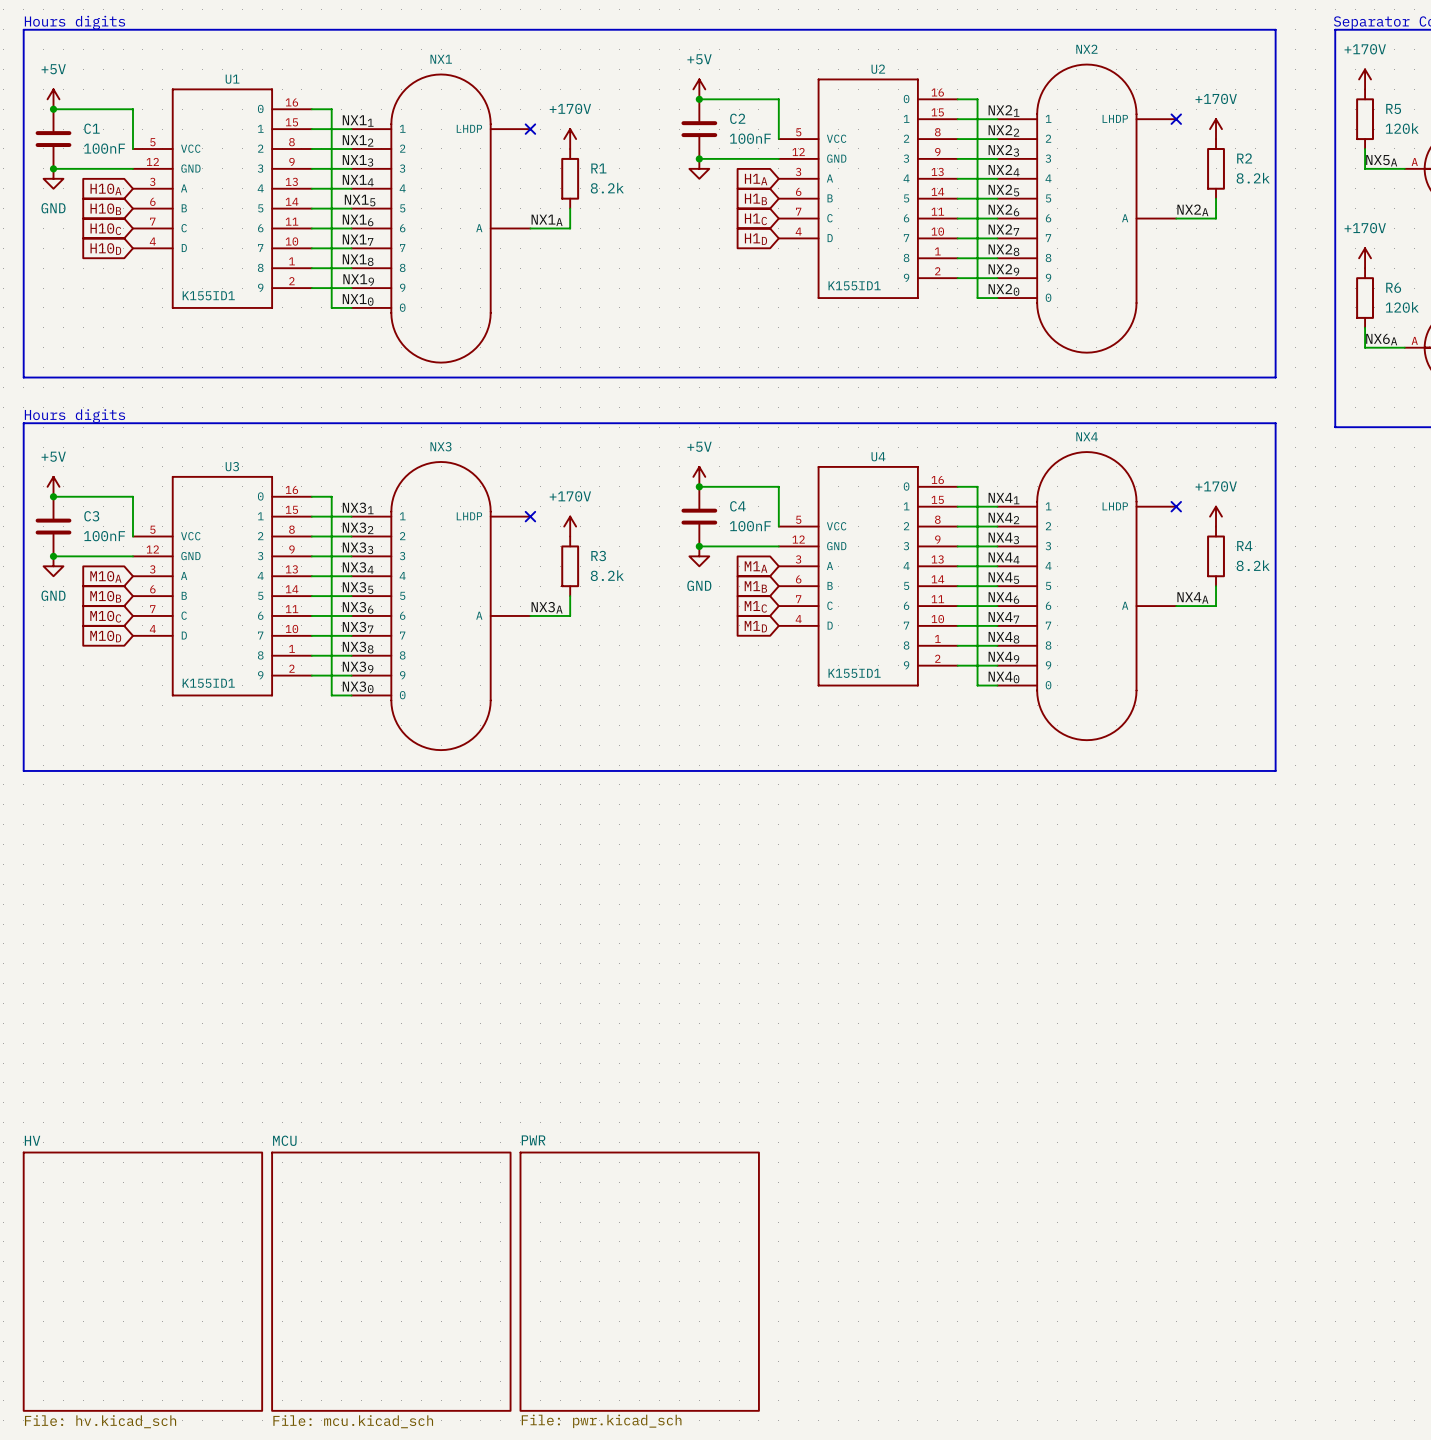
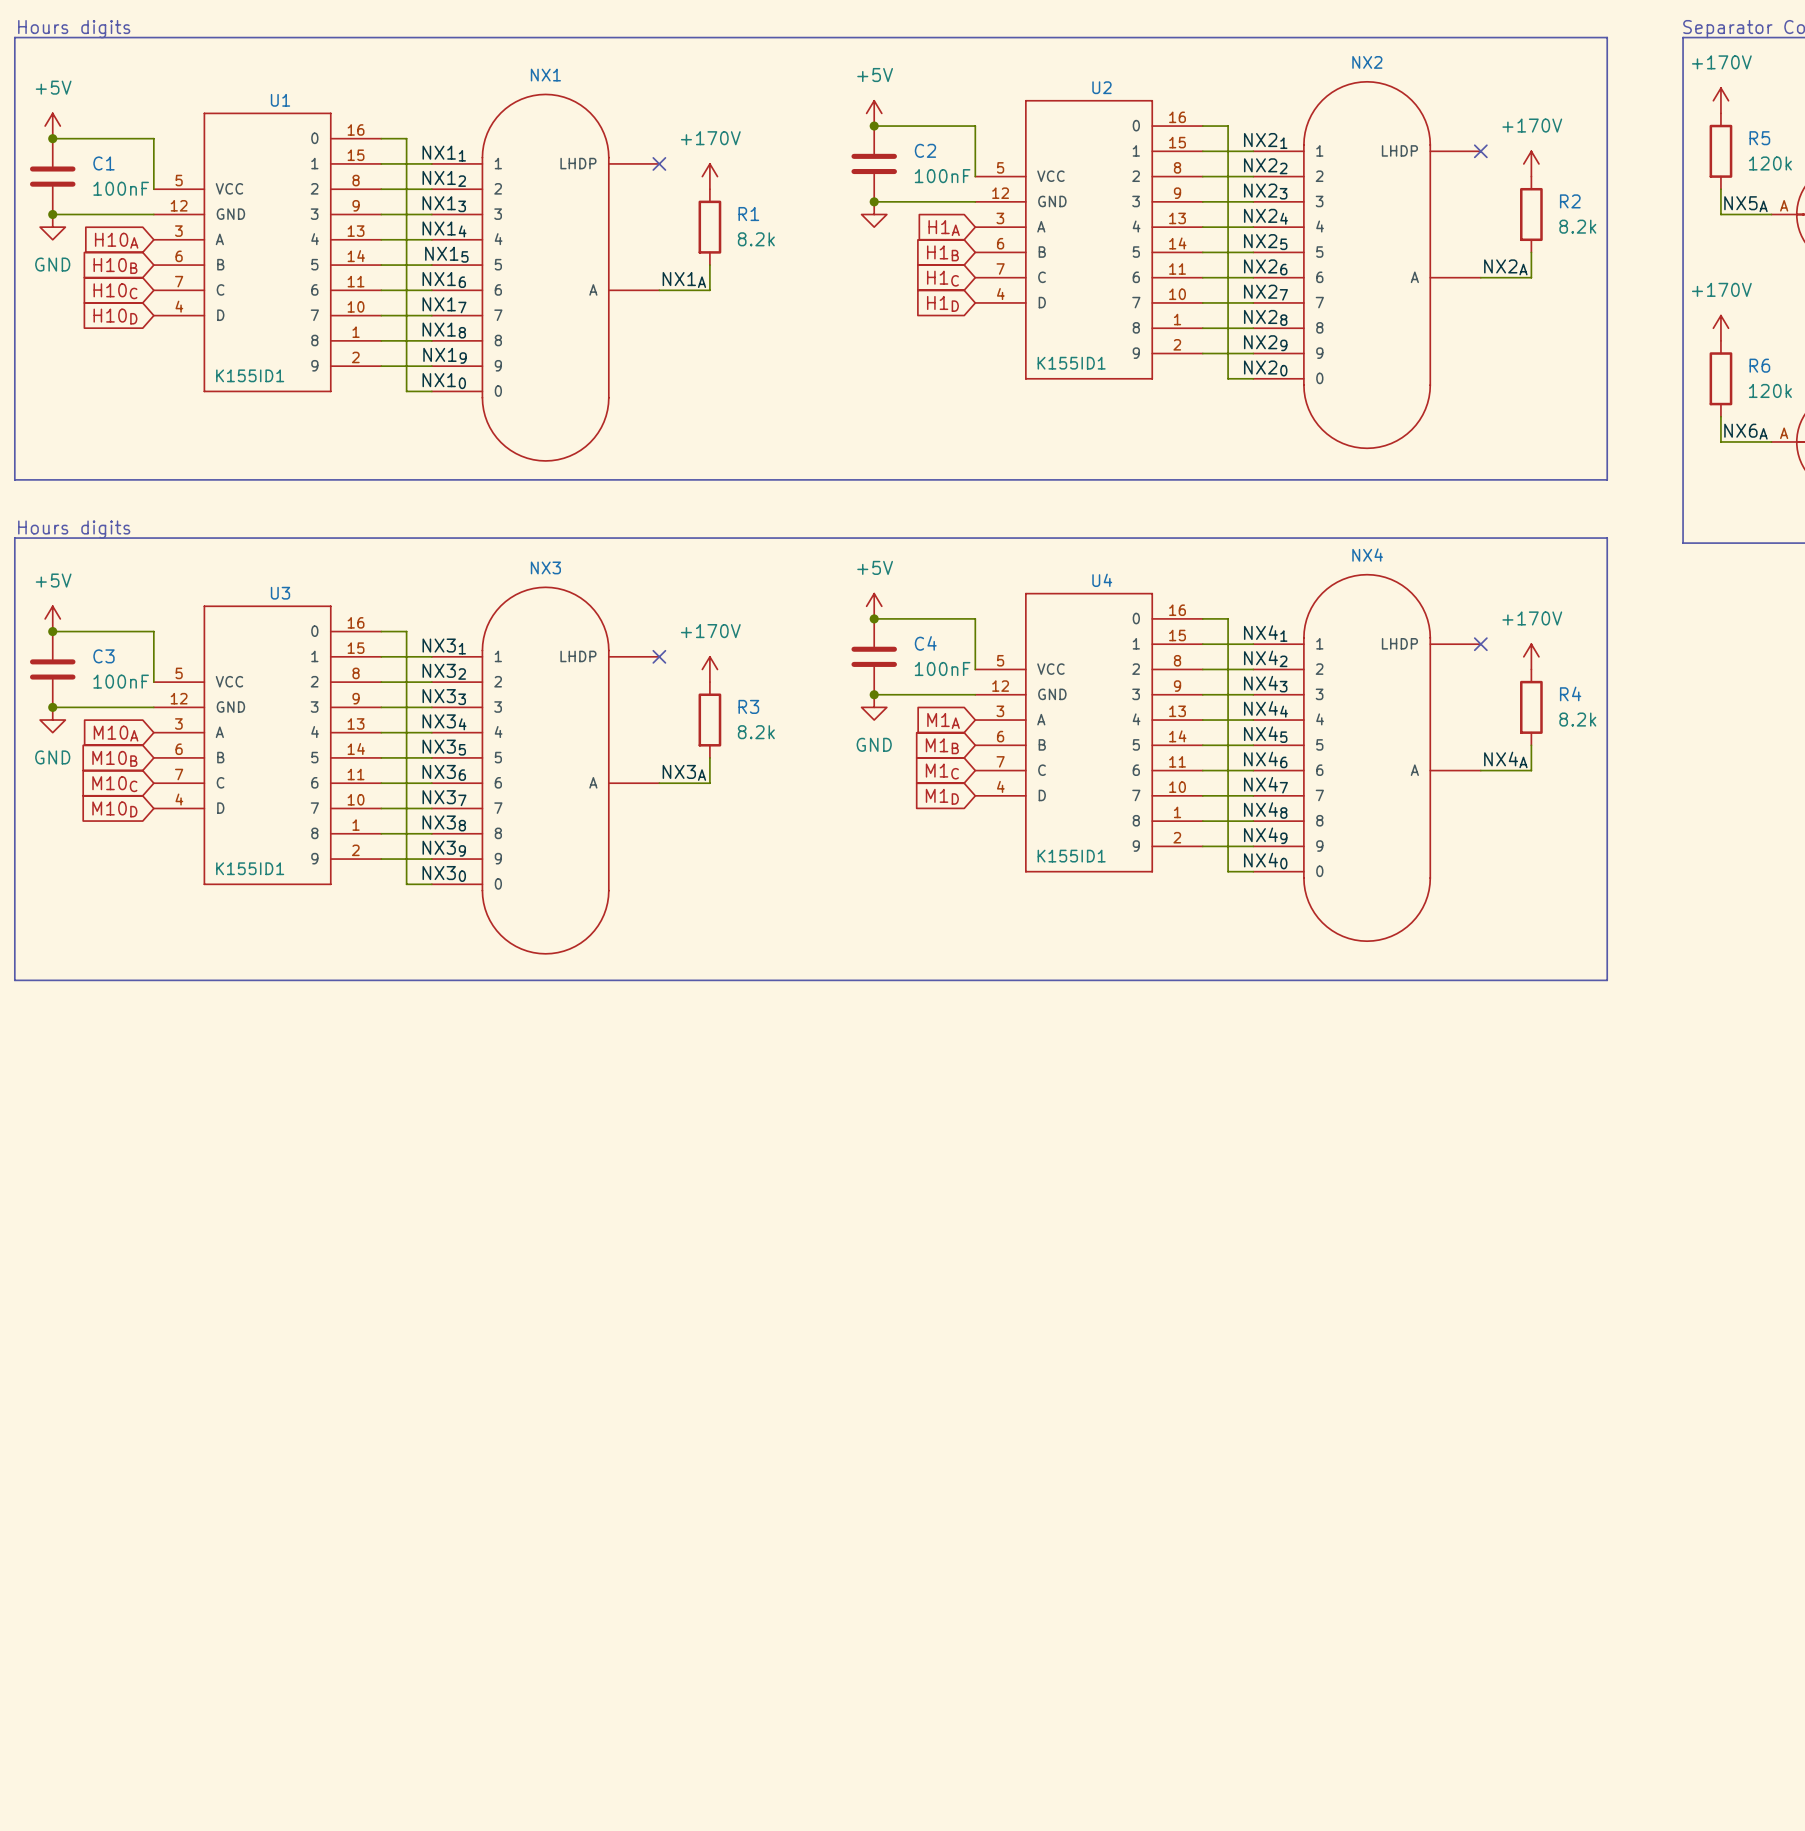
sheet HV: File: hv.kicad_sch (142, 1281) -> none
sheet MCU: File: mcu.kicad_sch (391, 1281) -> none
sheet PWR: File: pwr.kicad_sch (639, 1281) -> none

